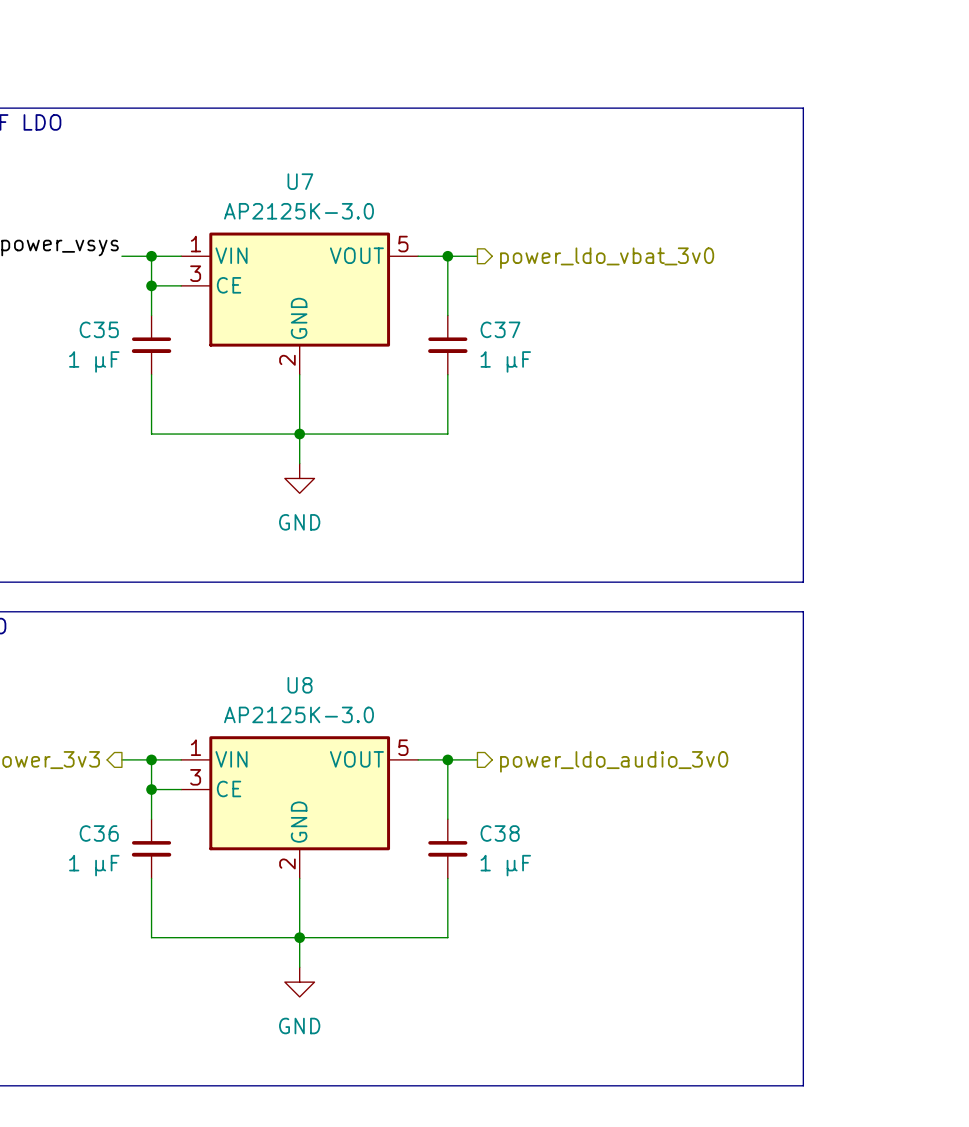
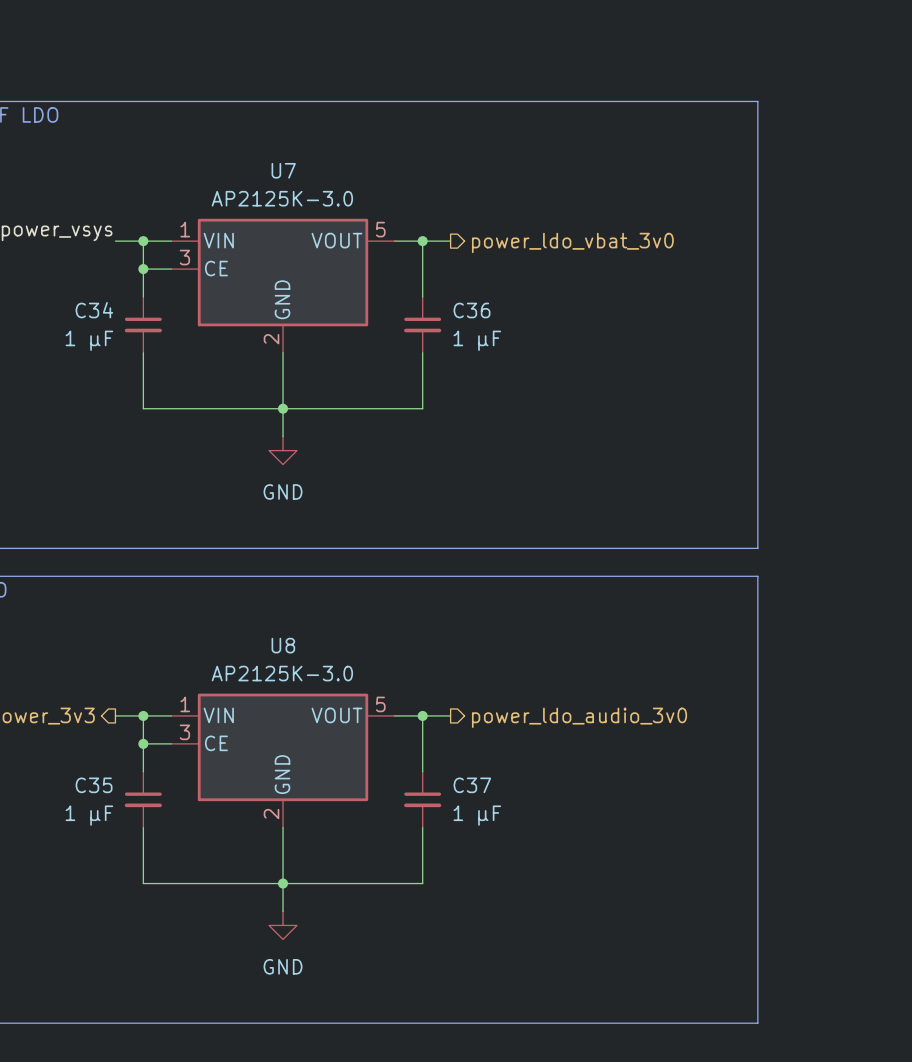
C35 name: C35 (99, 329) -> C34 (94, 310)
C37 name: C37 (500, 329) -> C36 (472, 310)
C36 name: C36 (99, 833) -> C35 (94, 785)
C38 name: C38 (500, 833) -> C37 (472, 785)

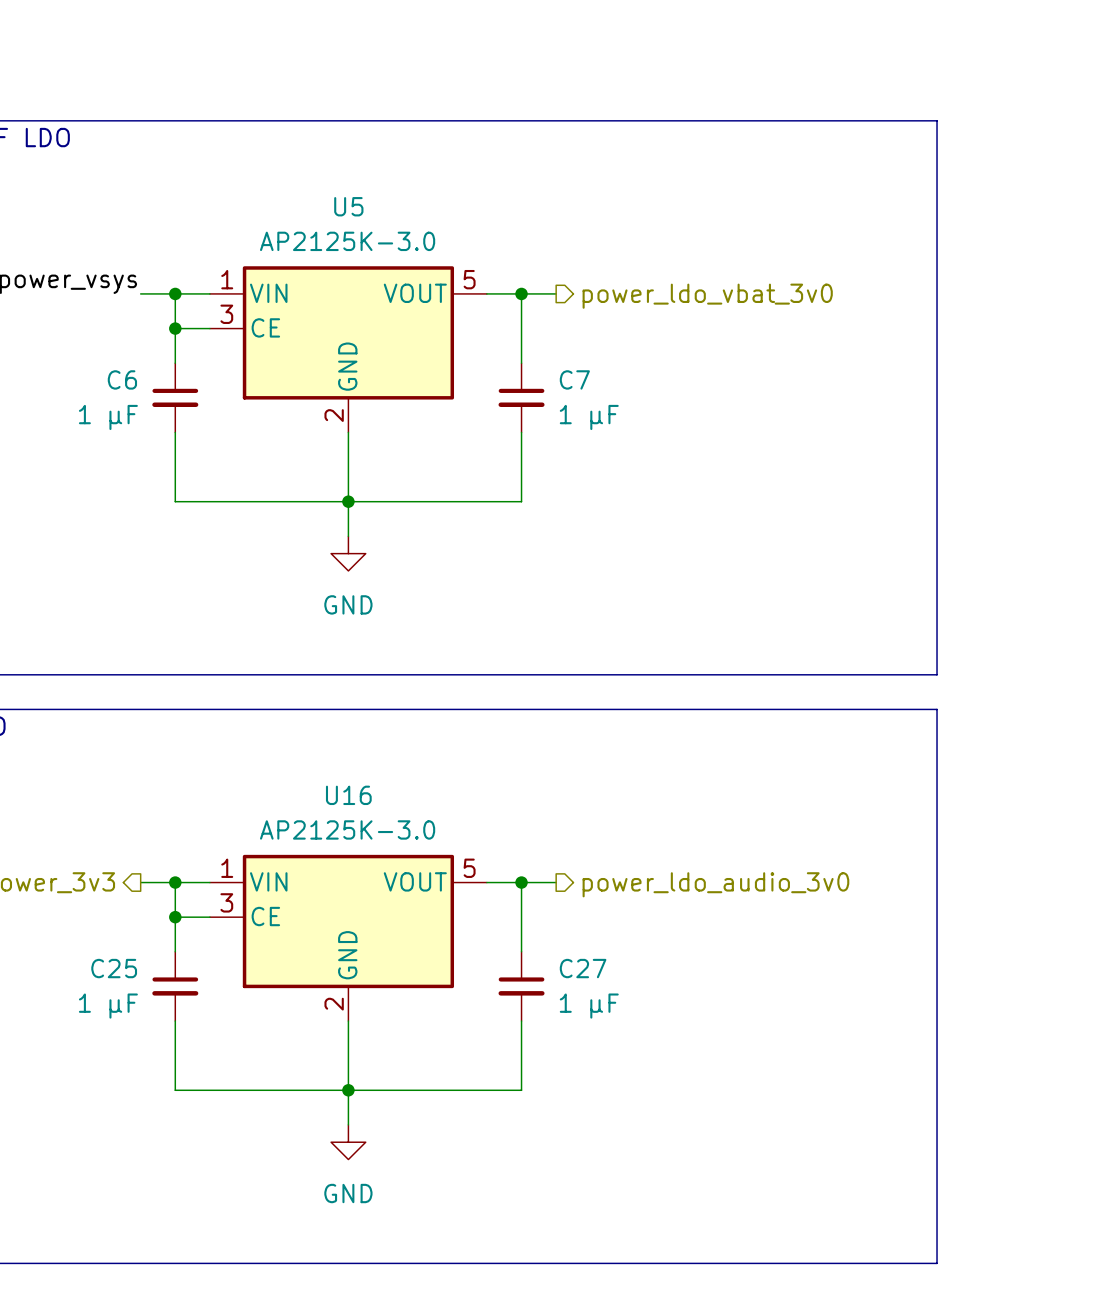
U7 name: U7 (283, 170) -> U5 (348, 206)
C34 name: C34 (94, 310) -> C6 (122, 379)
C36 name: C36 (472, 310) -> C7 (574, 379)
U8 name: U8 (283, 645) -> U16 (348, 795)
C35 name: C35 (94, 785) -> C25 (114, 968)
C37 name: C37 (472, 785) -> C27 (583, 968)

